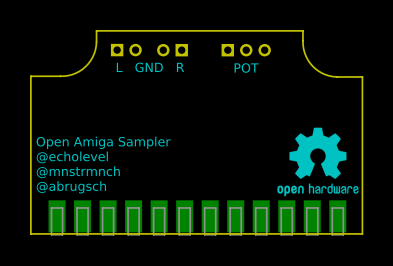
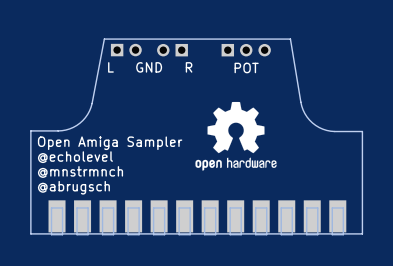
board edge: (30, 130) (30, 76) (64, 76) (82, 69) (94, 53) (96, 30) (302, 30) (304, 52) (315, 68) (333, 76) (362, 76) (362, 131) -> (30, 130) (65, 130) (76, 125) (85, 117) (92, 103) (104, 39) (290, 39) (300, 102) (307, 116) (315, 125) (326, 130) (362, 131)
drawing position: (317, 162) -> (236, 136)

